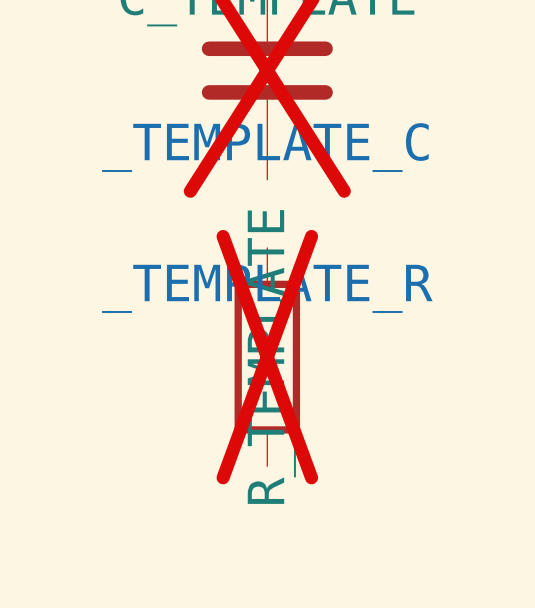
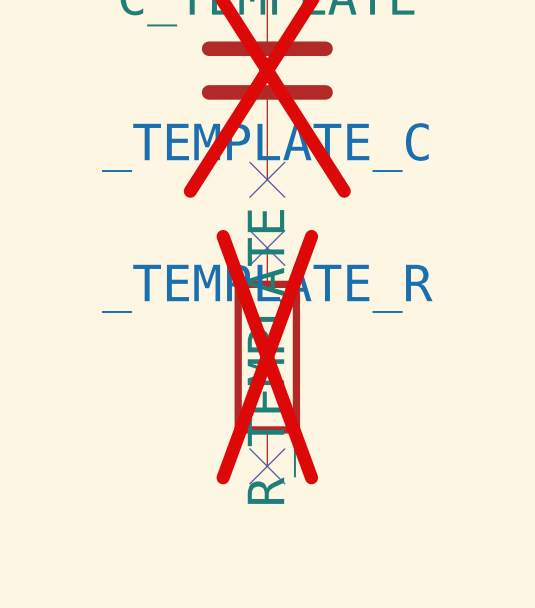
no-connect mark: none -> (267, 179)
no-connect mark: none -> (267, 247)
no-connect mark: none -> (267, 466)

